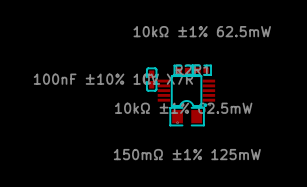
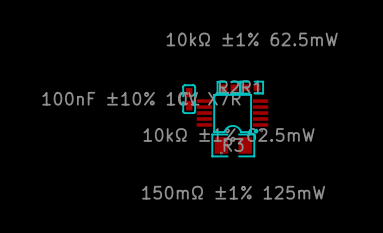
R3 name: none -> R3 (233, 145)

